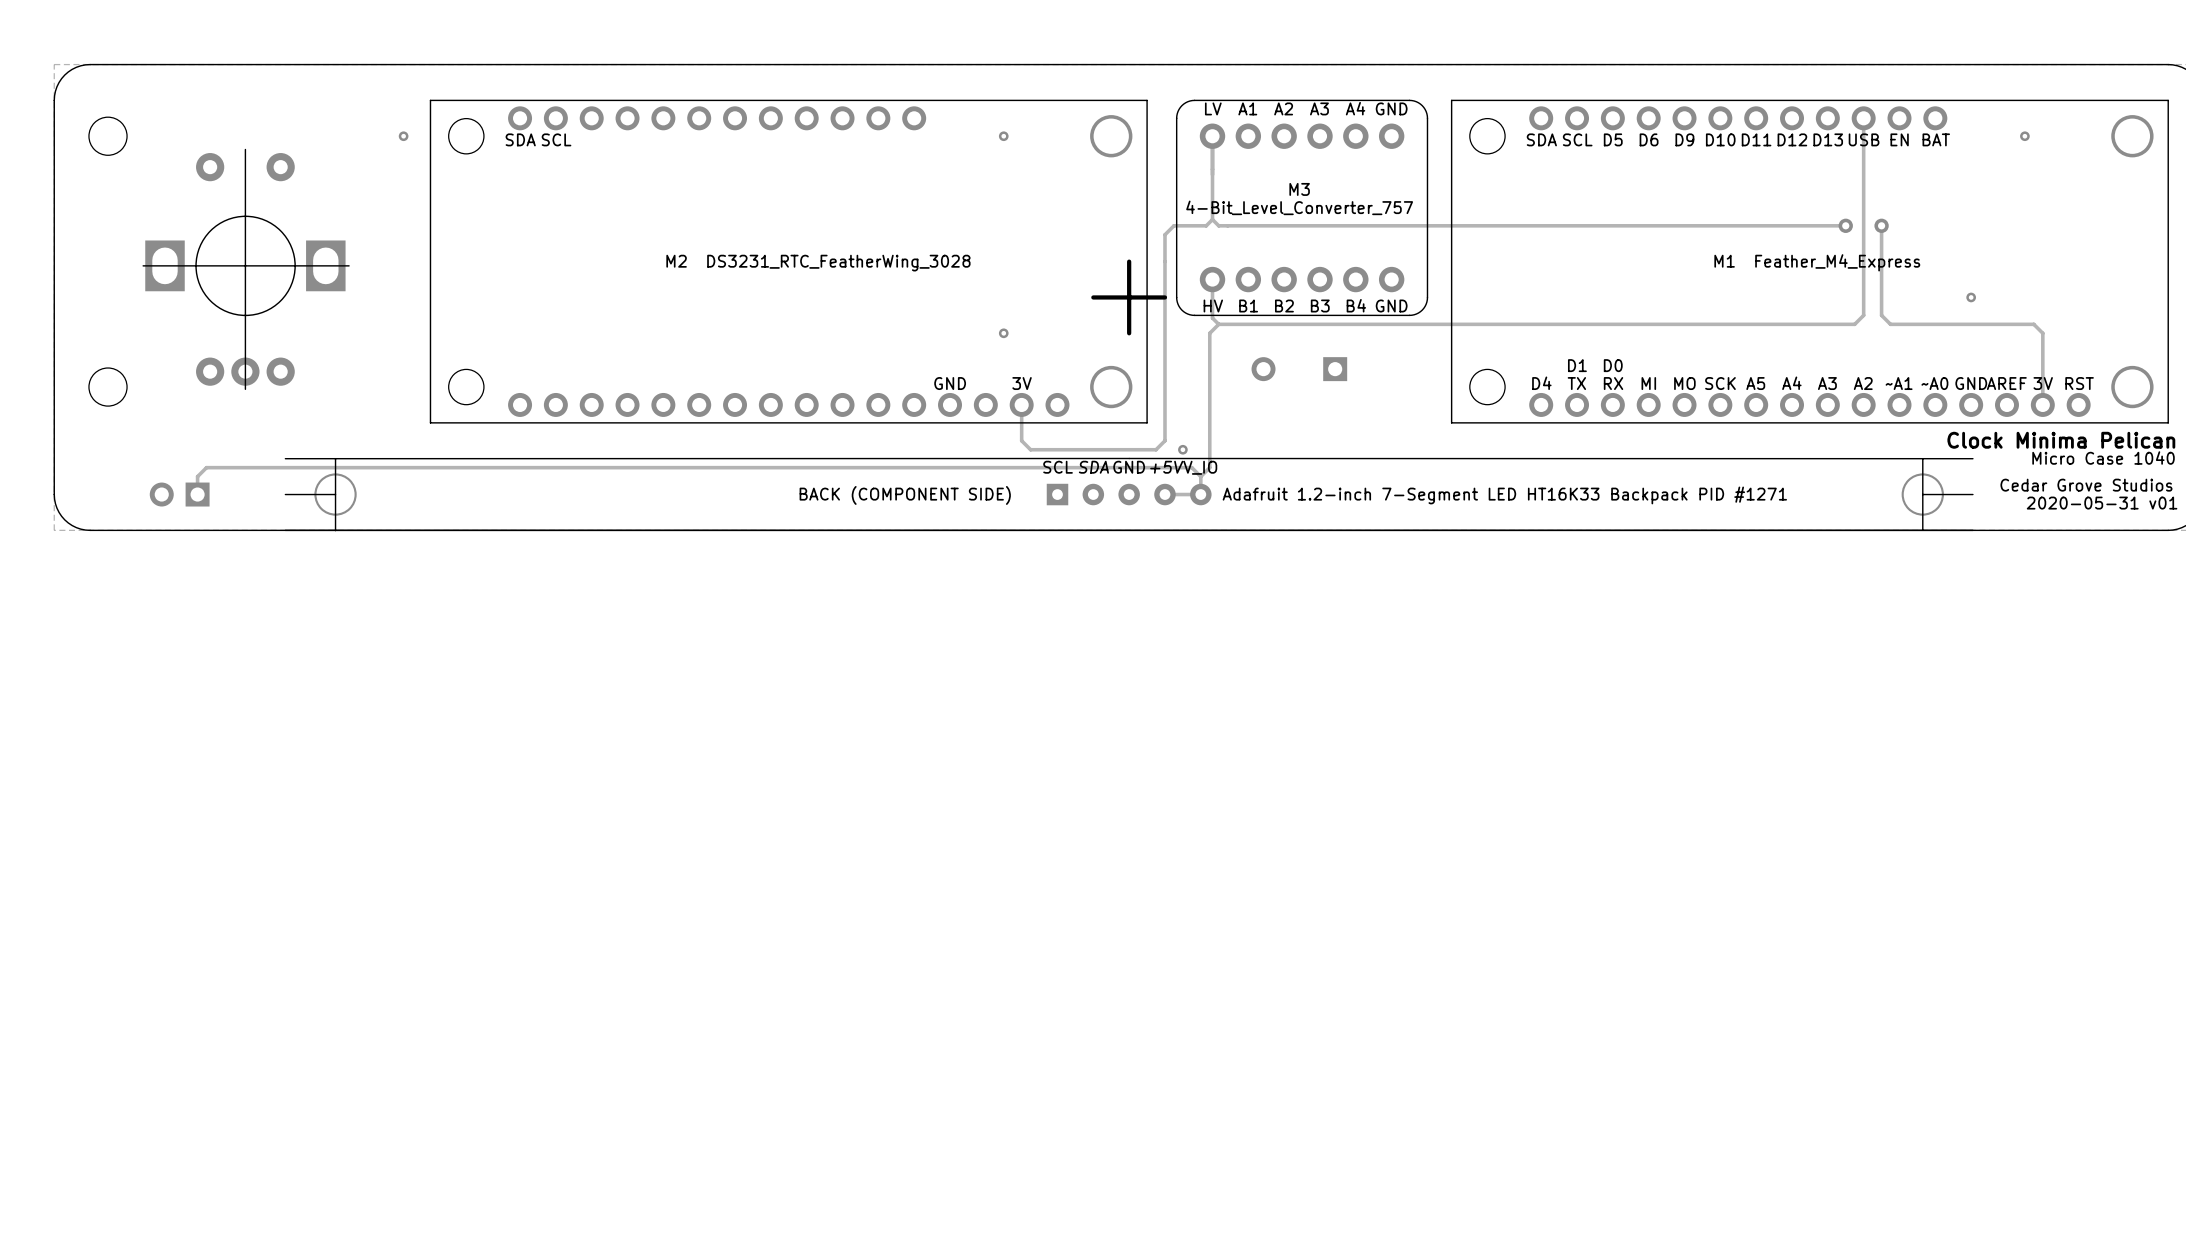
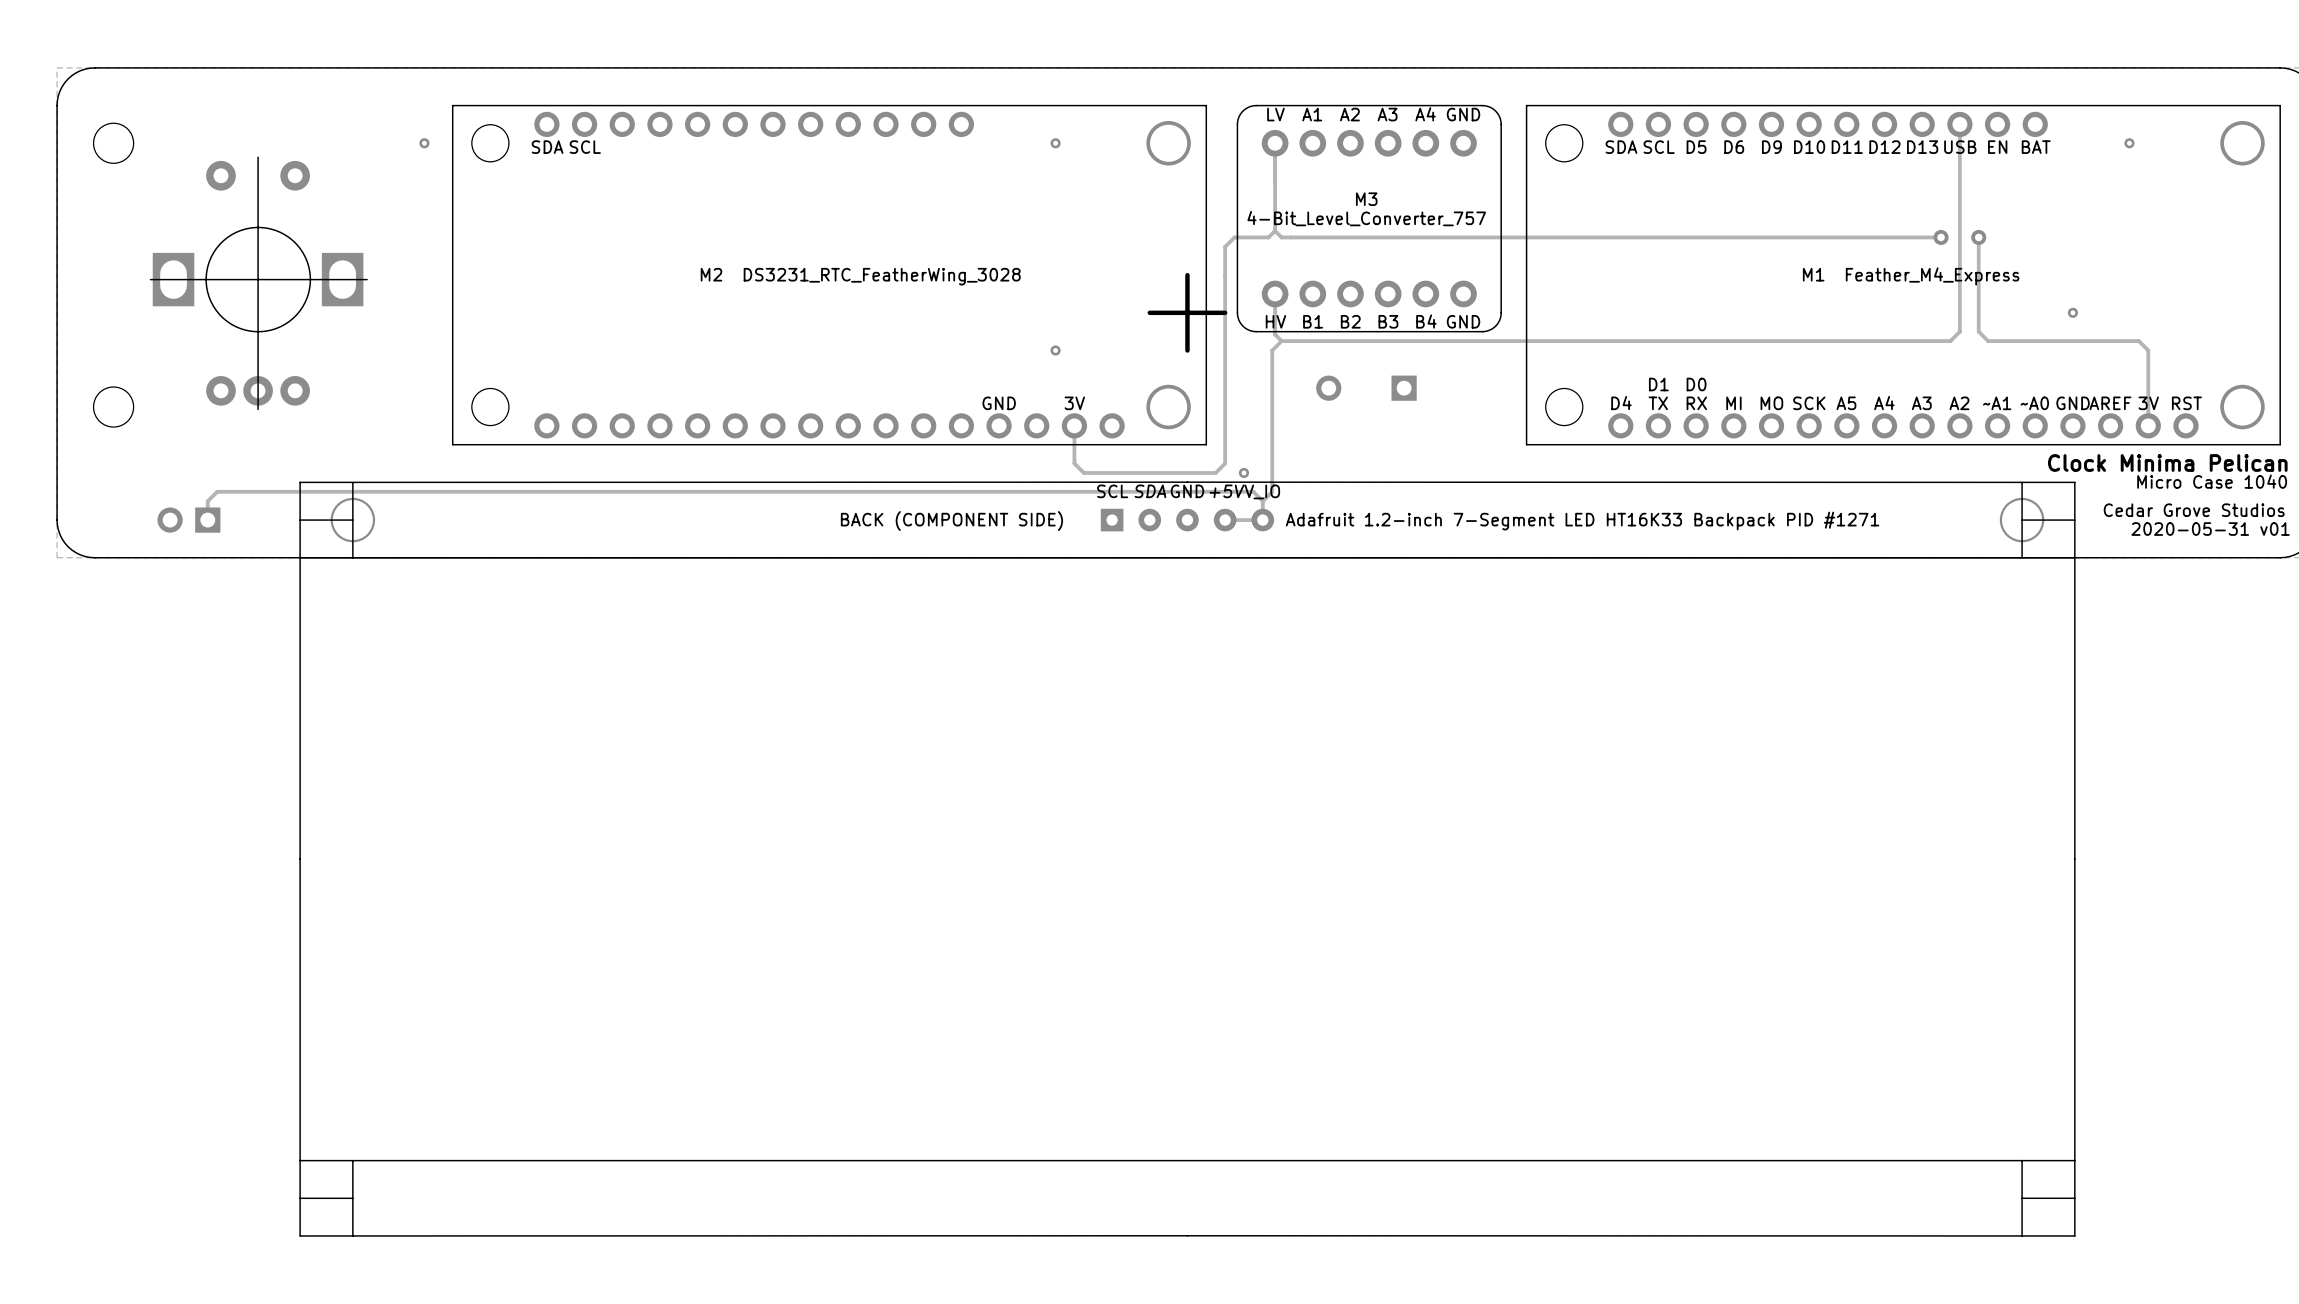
part: (1129, 494) -> none
part: none -> (1187, 859)

